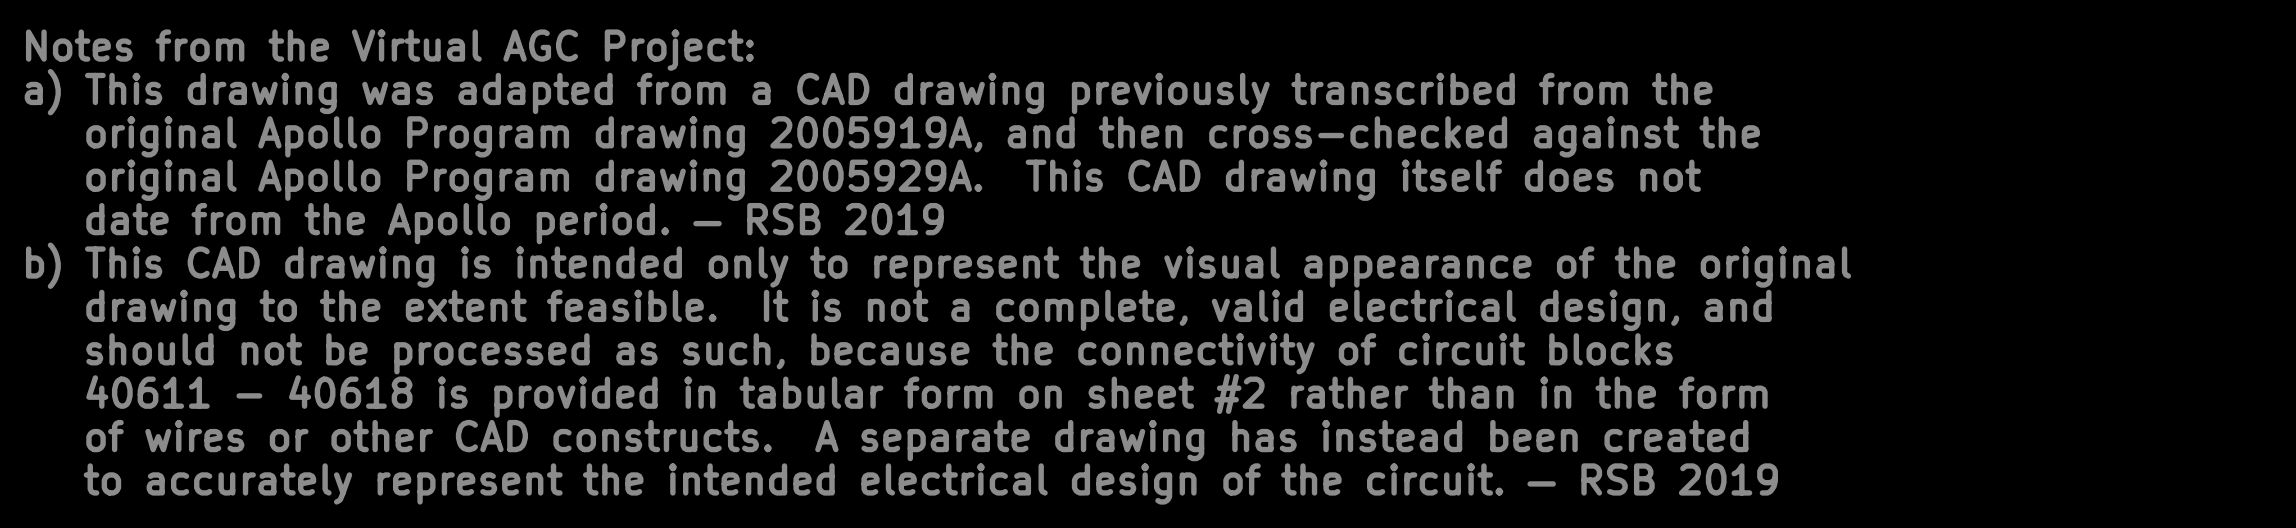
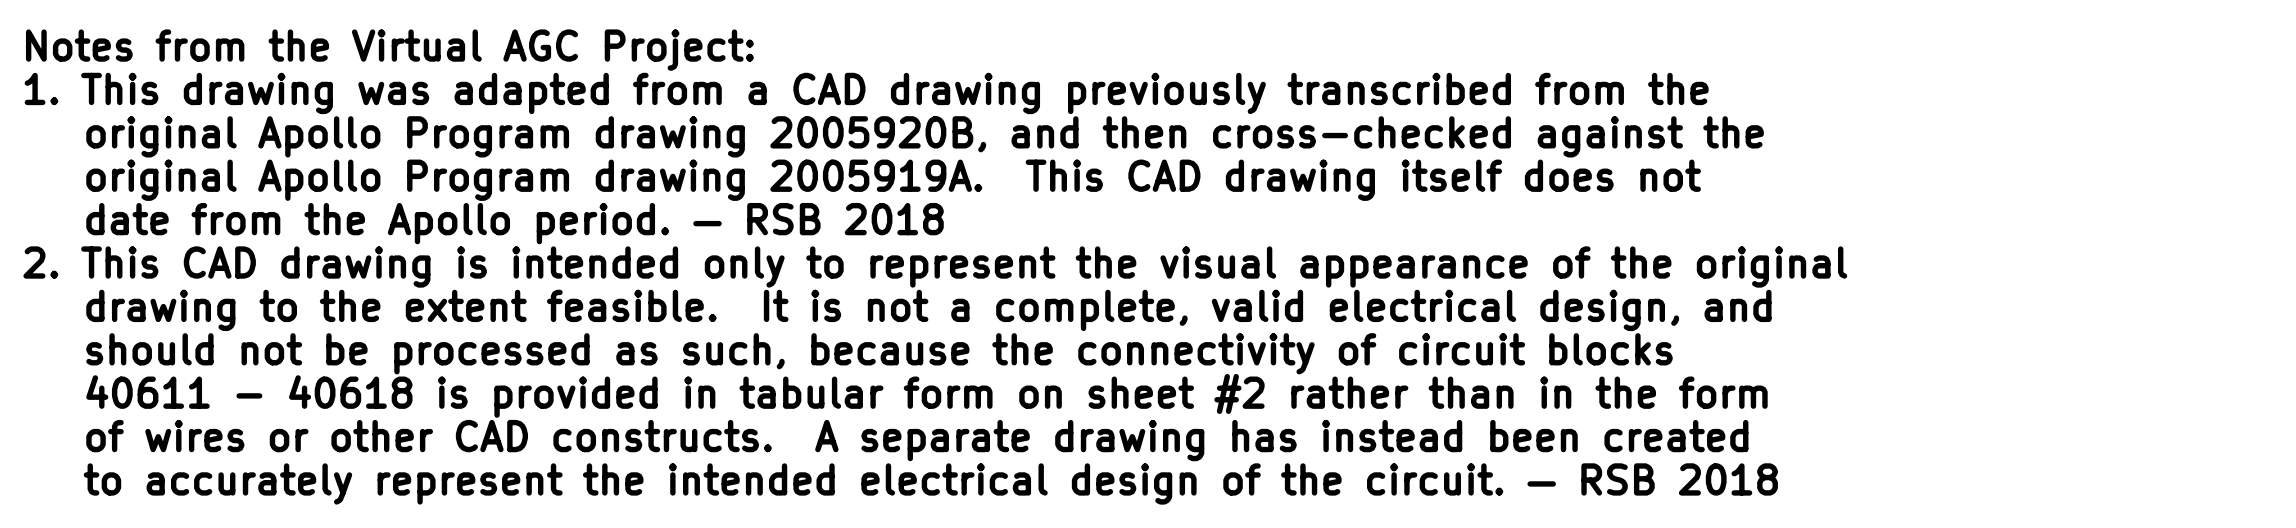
text: a) This drawing was adapted from a CAD drawing previously transcribed from the (868, 92) -> 1. This drawing was adapted from a CAD drawing previously transcribed from the (866, 93)
text: original Apollo Program drawing 2005919A, and then cross-checked against the (923, 136) -> original Apollo Program drawing 2005920B, and then cross-checked against the (925, 136)
text: original Apollo Program drawing 2005929A. This CAD drawing itself does not (893, 180) -> original Apollo Program drawing 2005919A. This CAD drawing itself does not (893, 180)
text: date from the Apollo period. — RSB 2019 (515, 223) -> date from the Apollo period. — RSB 2018 (515, 223)
text: b) This CAD drawing is intended only to represent the visual appearance of the original (938, 265) -> 2. This CAD drawing is intended only to represent the visual appearance of the original (935, 267)
text: to accurately represent the intended electrical design of the circuit. — RSB 2019 (930, 483) -> to accurately represent the intended electrical design of the circuit. — RSB 2018 (930, 483)

